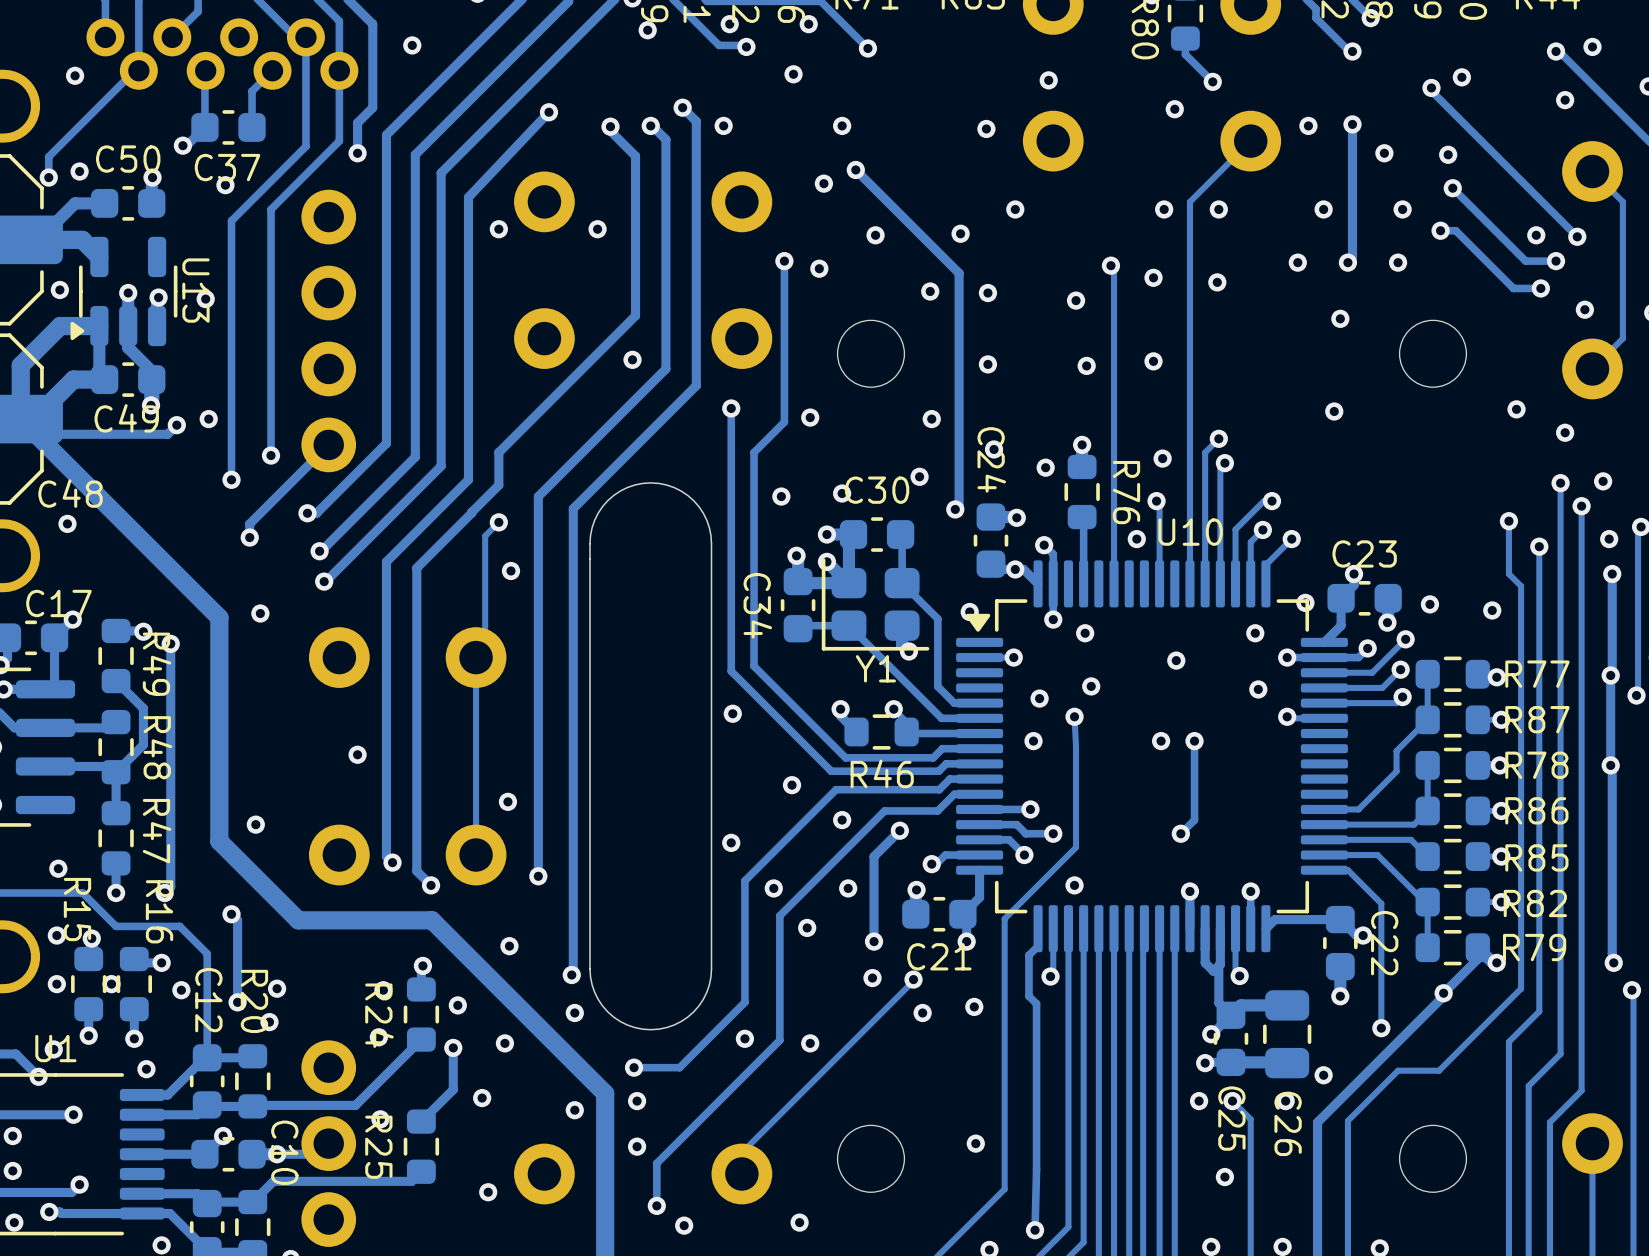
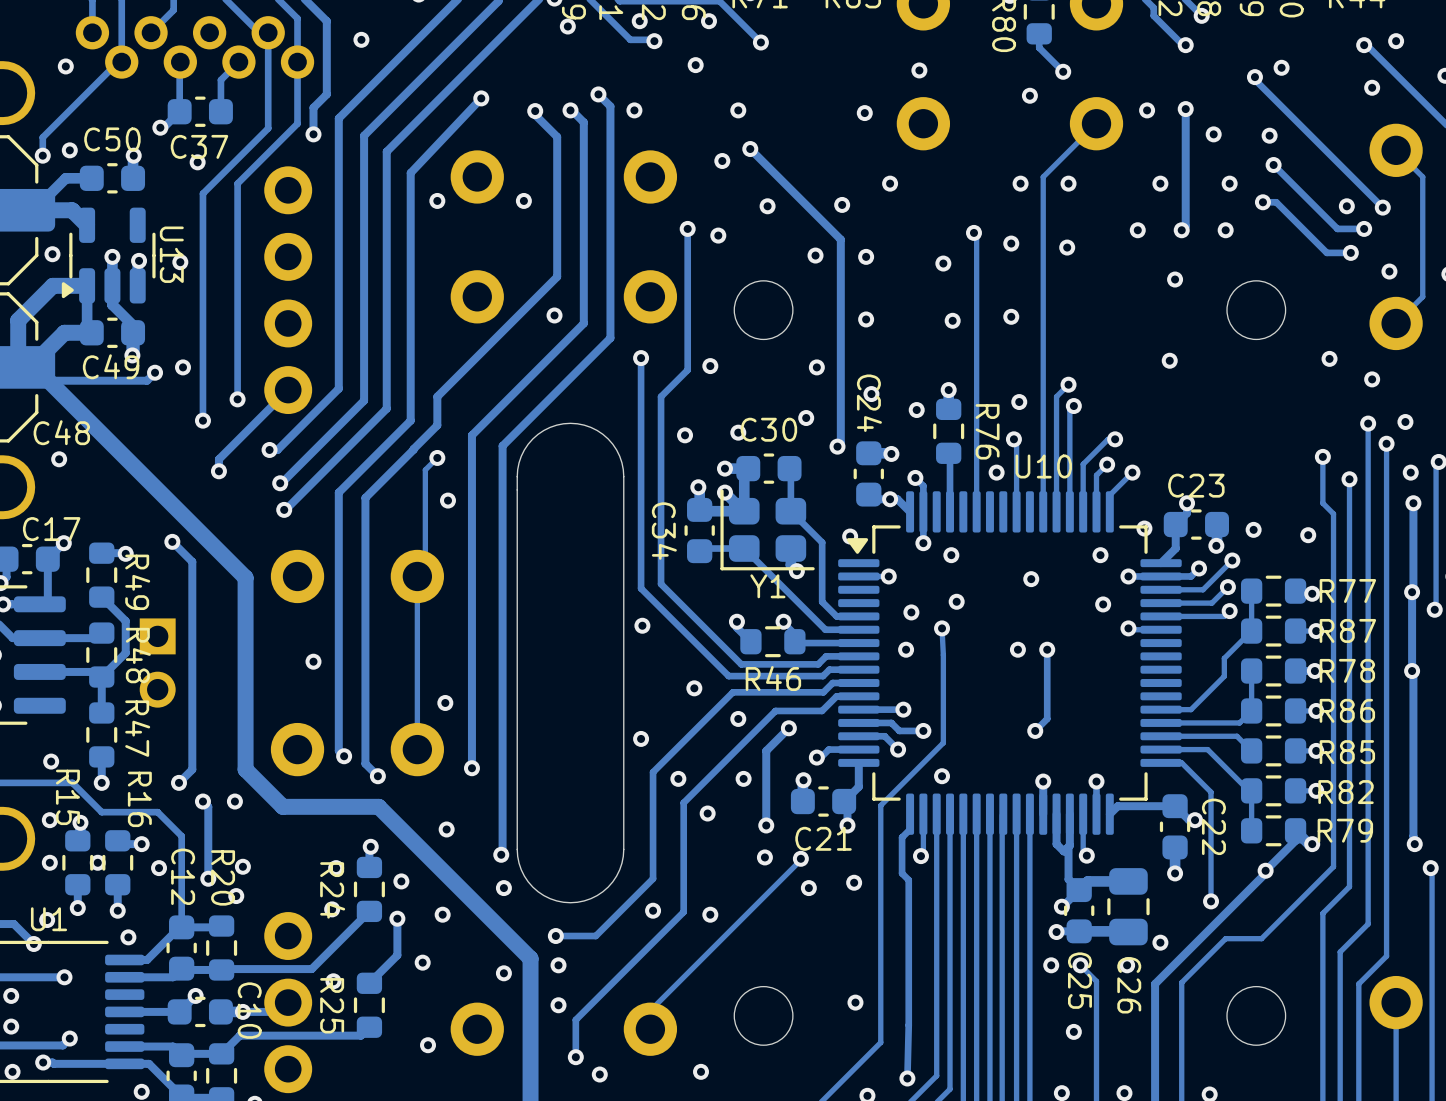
track: (20, 419) (219, 617) (219, 640) -> (172, 541) (192, 561)
track: none -> (18, 367) (35, 367) (245, 577) (245, 769) (282, 806)
via: (260, 613) -> none
via: none -> (172, 541)
track width: thick (219, 640) (219, 841) -> thin (192, 561) (192, 737)
track: (170, 643) (170, 886) (164, 892) -> none
via: (170, 643) -> none
part: none -> (157, 663)
via: (255, 824) -> none
track: (219, 841) (298, 920) (322, 920) -> (192, 737) (192, 769) (179, 782)
via position: (164, 892) -> (179, 782)
via: none -> (234, 801)

